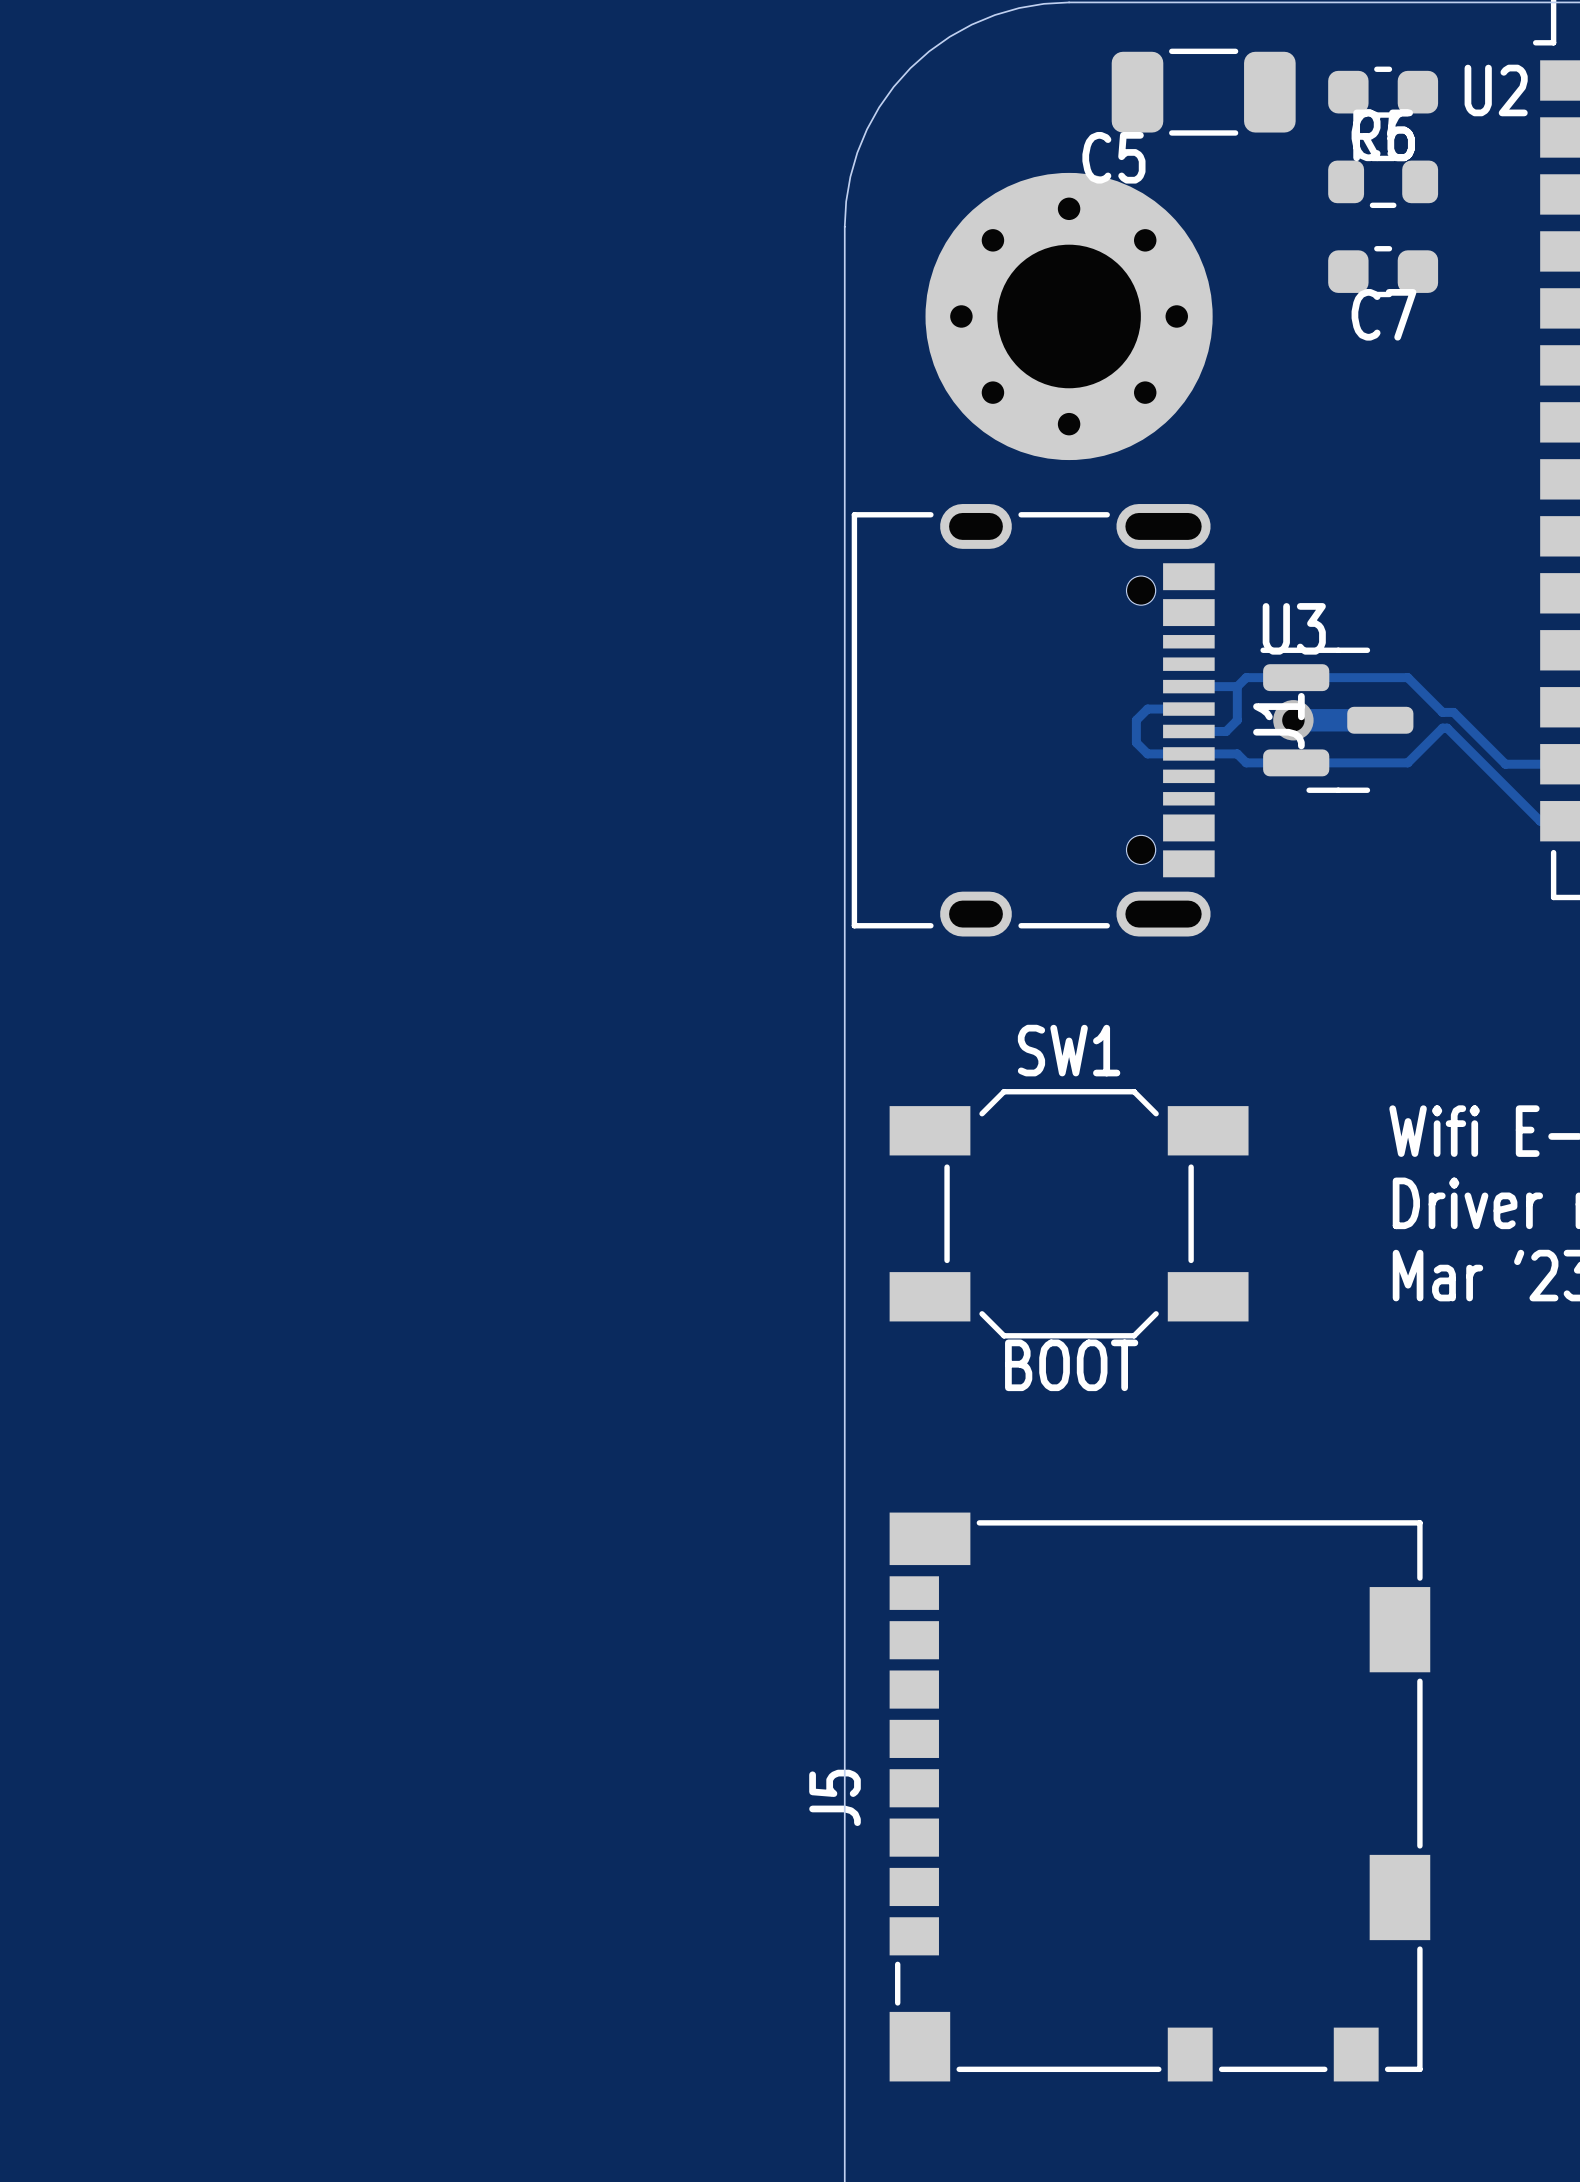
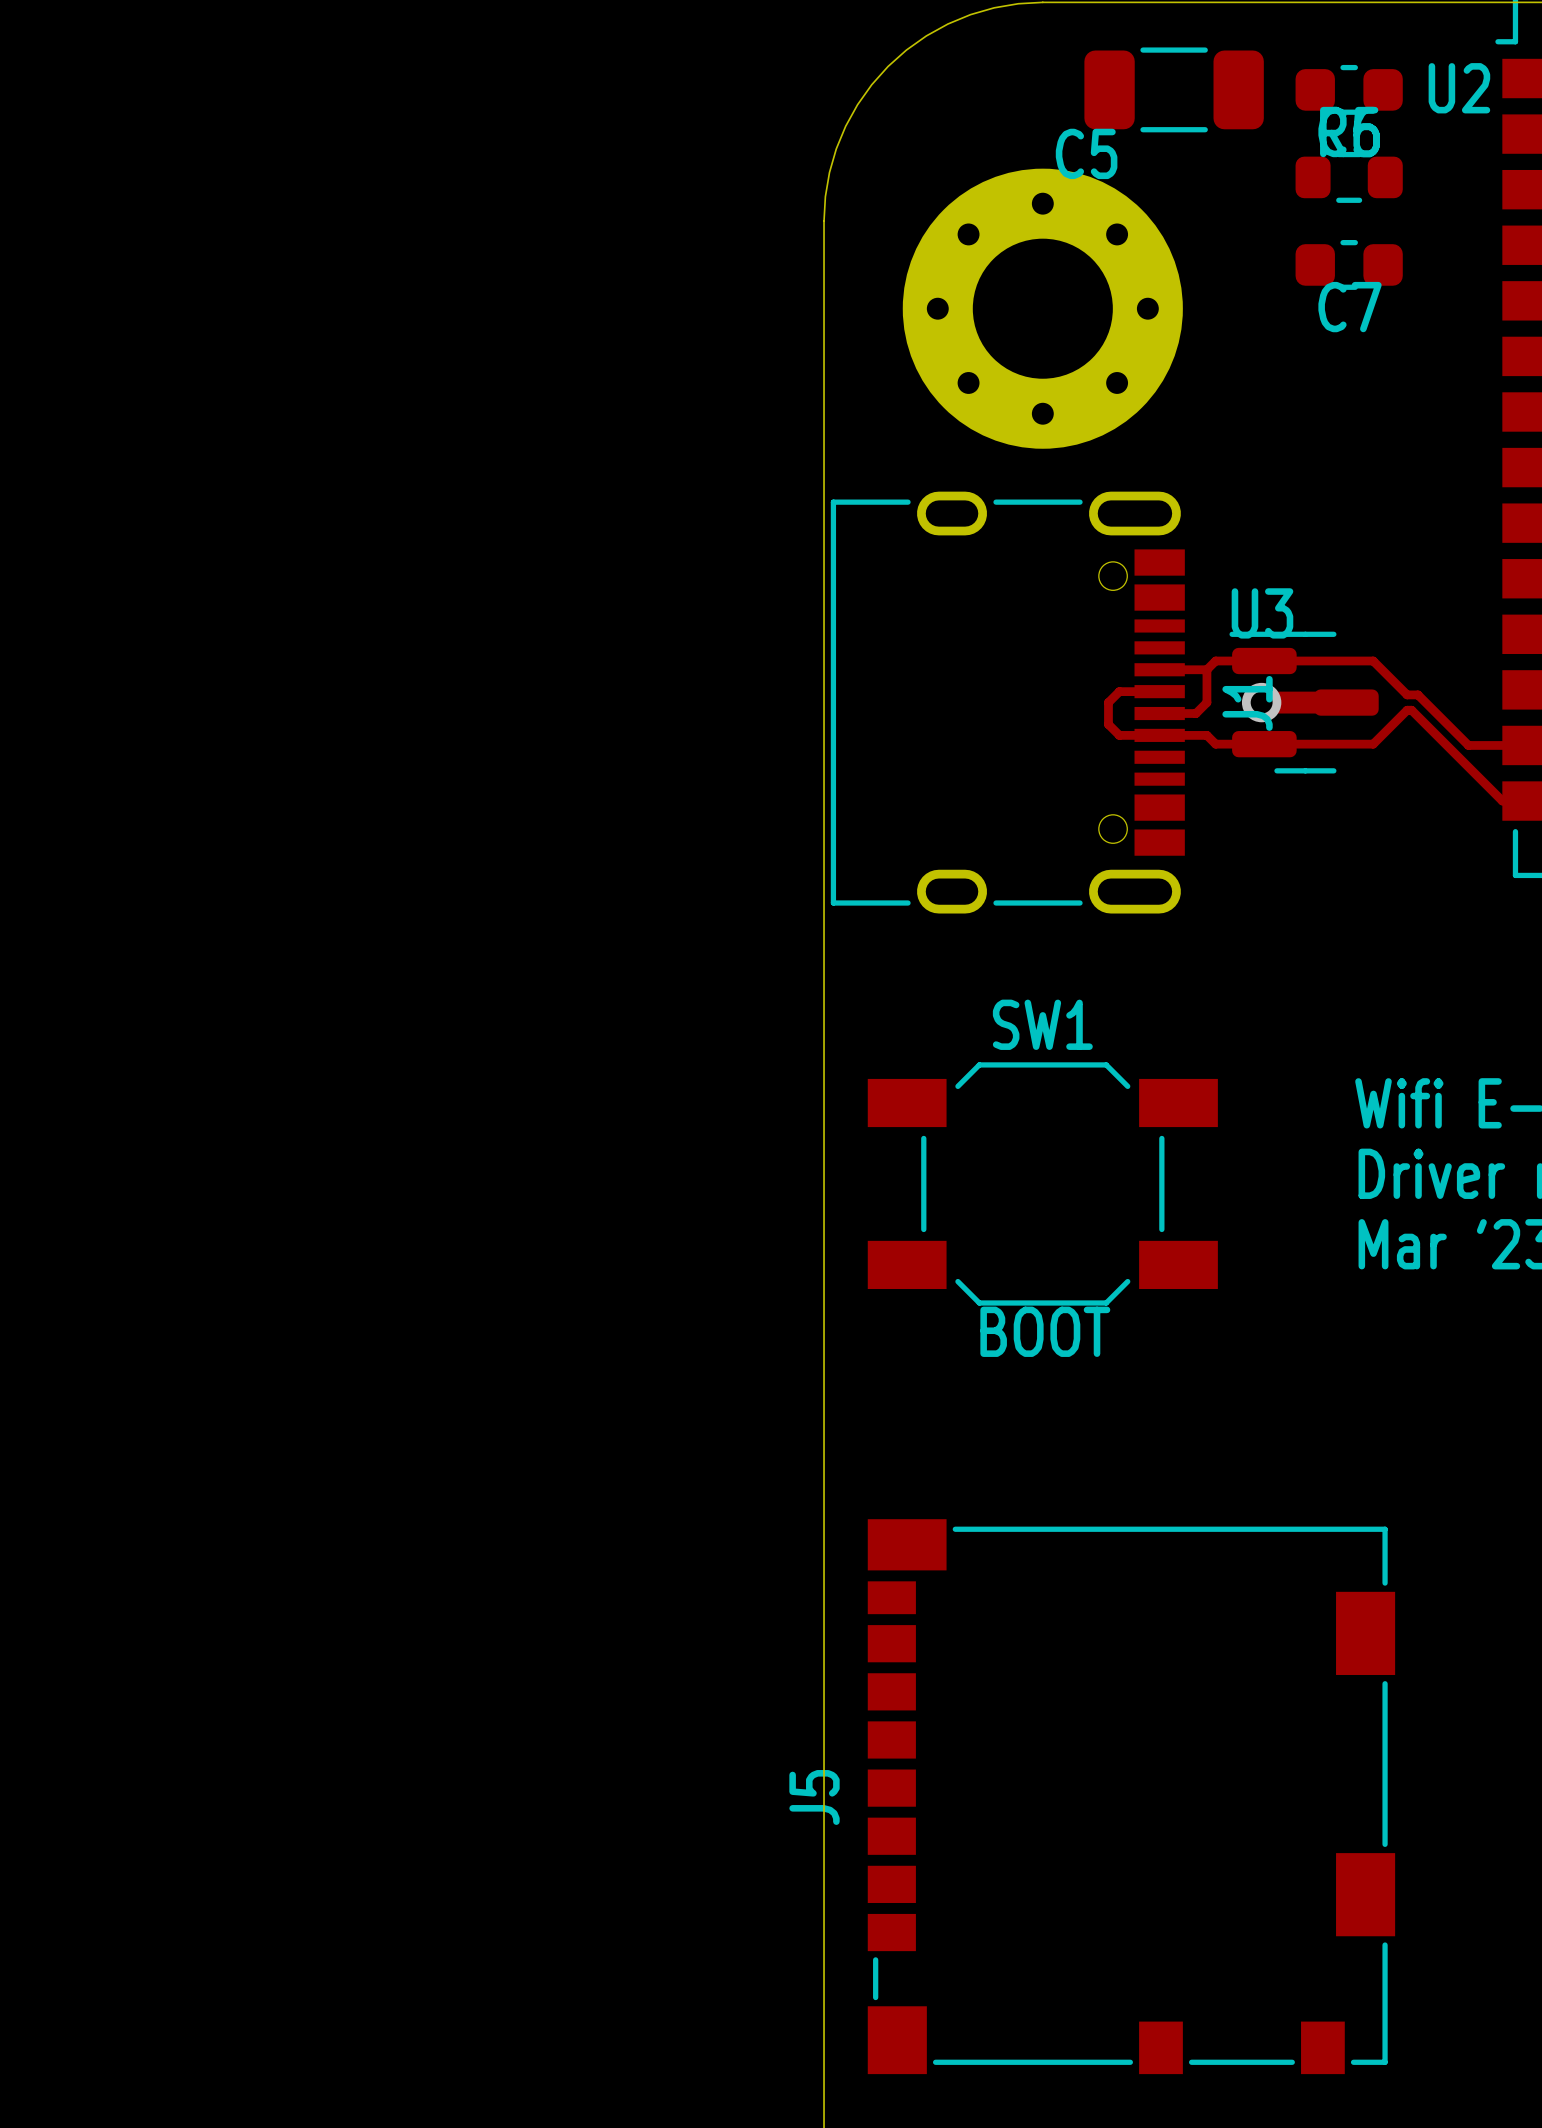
J5 position: (1159, 1797) -> (1131, 1796)

